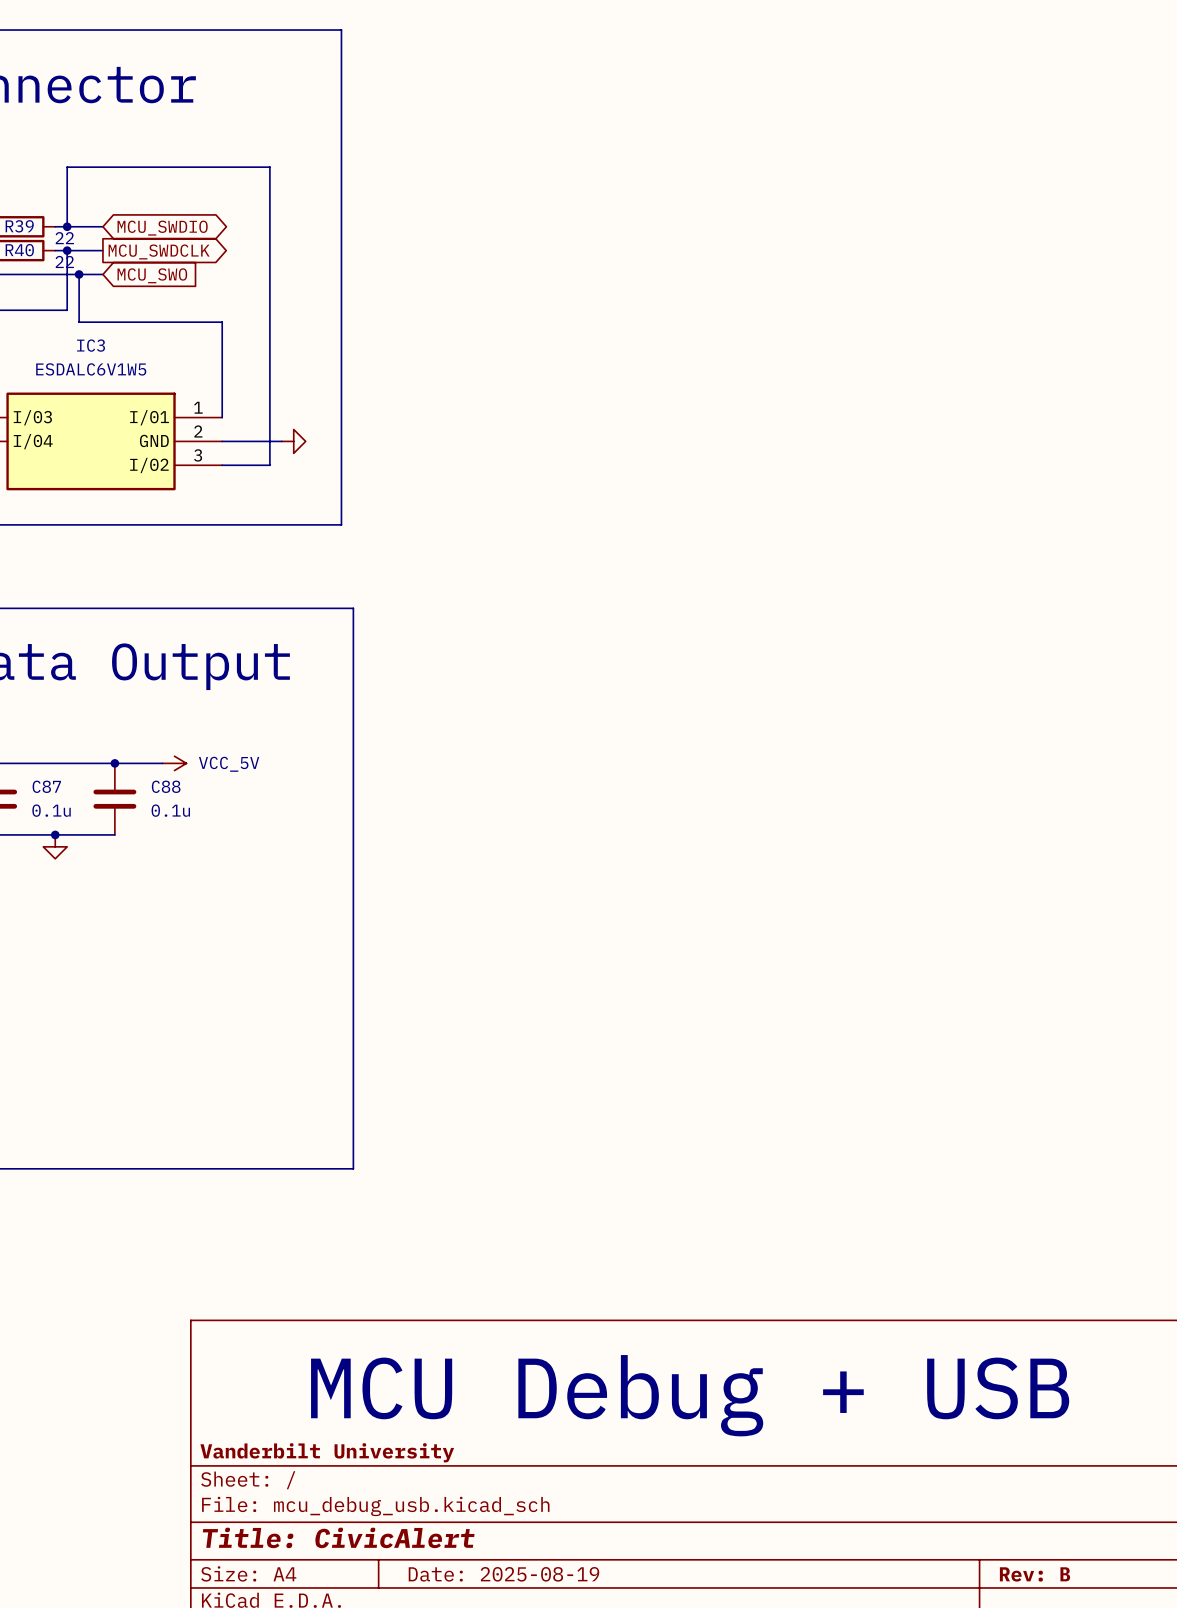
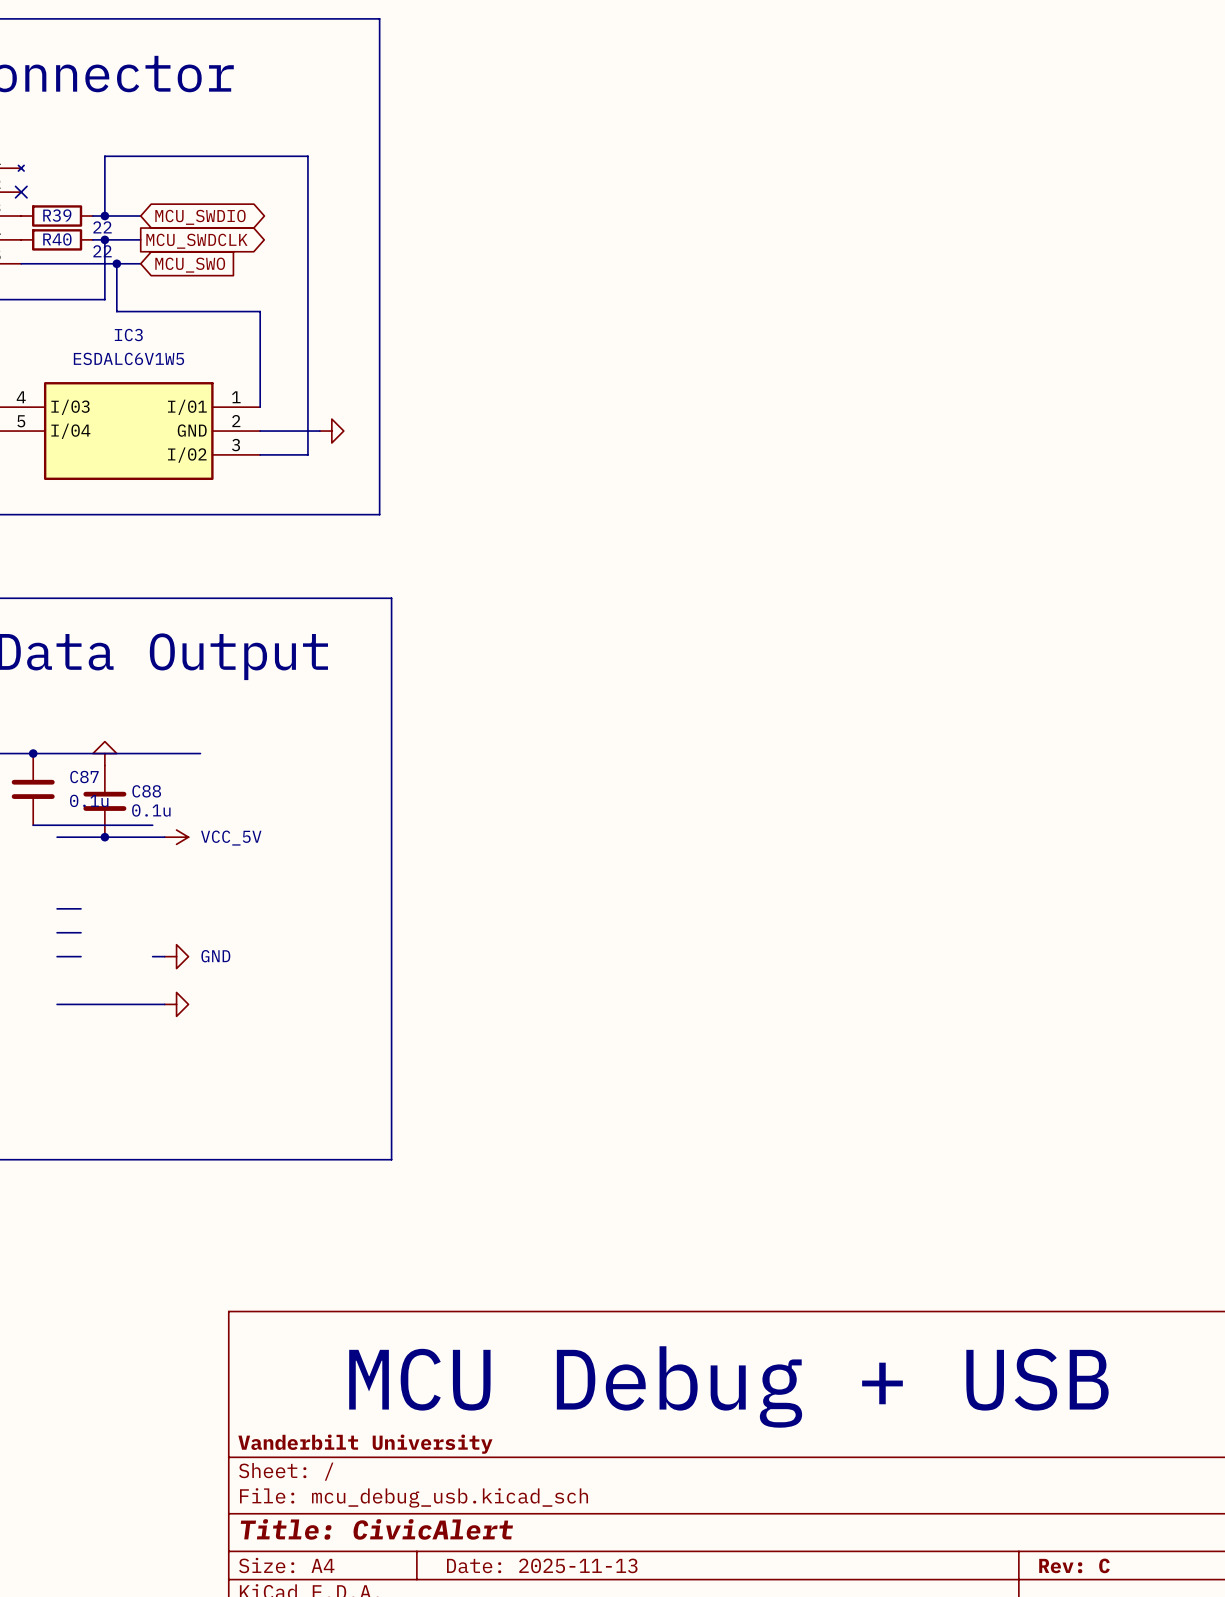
junction: (114, 763) -> none
power symbol position: VCC_5V (174, 763) -> VCC_5V (176, 837)
C88 name position: C88 (166, 786) -> C88 (146, 791)
C88 position: (114, 799) -> (104, 801)
C88 value position: 0.1u (170, 810) -> 0.1u (151, 810)
junction position: (55, 834) -> (104, 837)
wire: none -> (57, 837) (164, 837)
power symbol rotation: 0° (55, 846) -> 180° (104, 753)
power symbol position: (55, 846) -> (104, 753)
wire: none -> (57, 908) (80, 908)
wire: none -> (57, 932) (80, 932)
wire: none -> (57, 956) (80, 956)
wire: none -> (152, 956) (164, 956)
power symbol: none -> GND (176, 956)
wire: none -> (57, 1004) (164, 1004)
power symbol: none -> (176, 1004)
title block: Date: 2025-08-19 (503, 1574) -> Date: 2025-11-13 (542, 1565)
title block: Rev: B (1034, 1574) -> Rev: C (1074, 1565)

